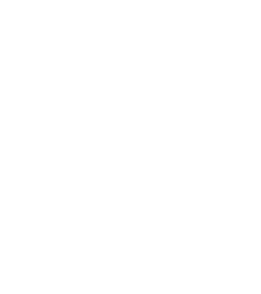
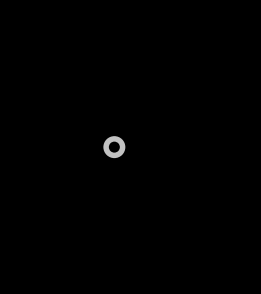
via: none -> (114, 147)

